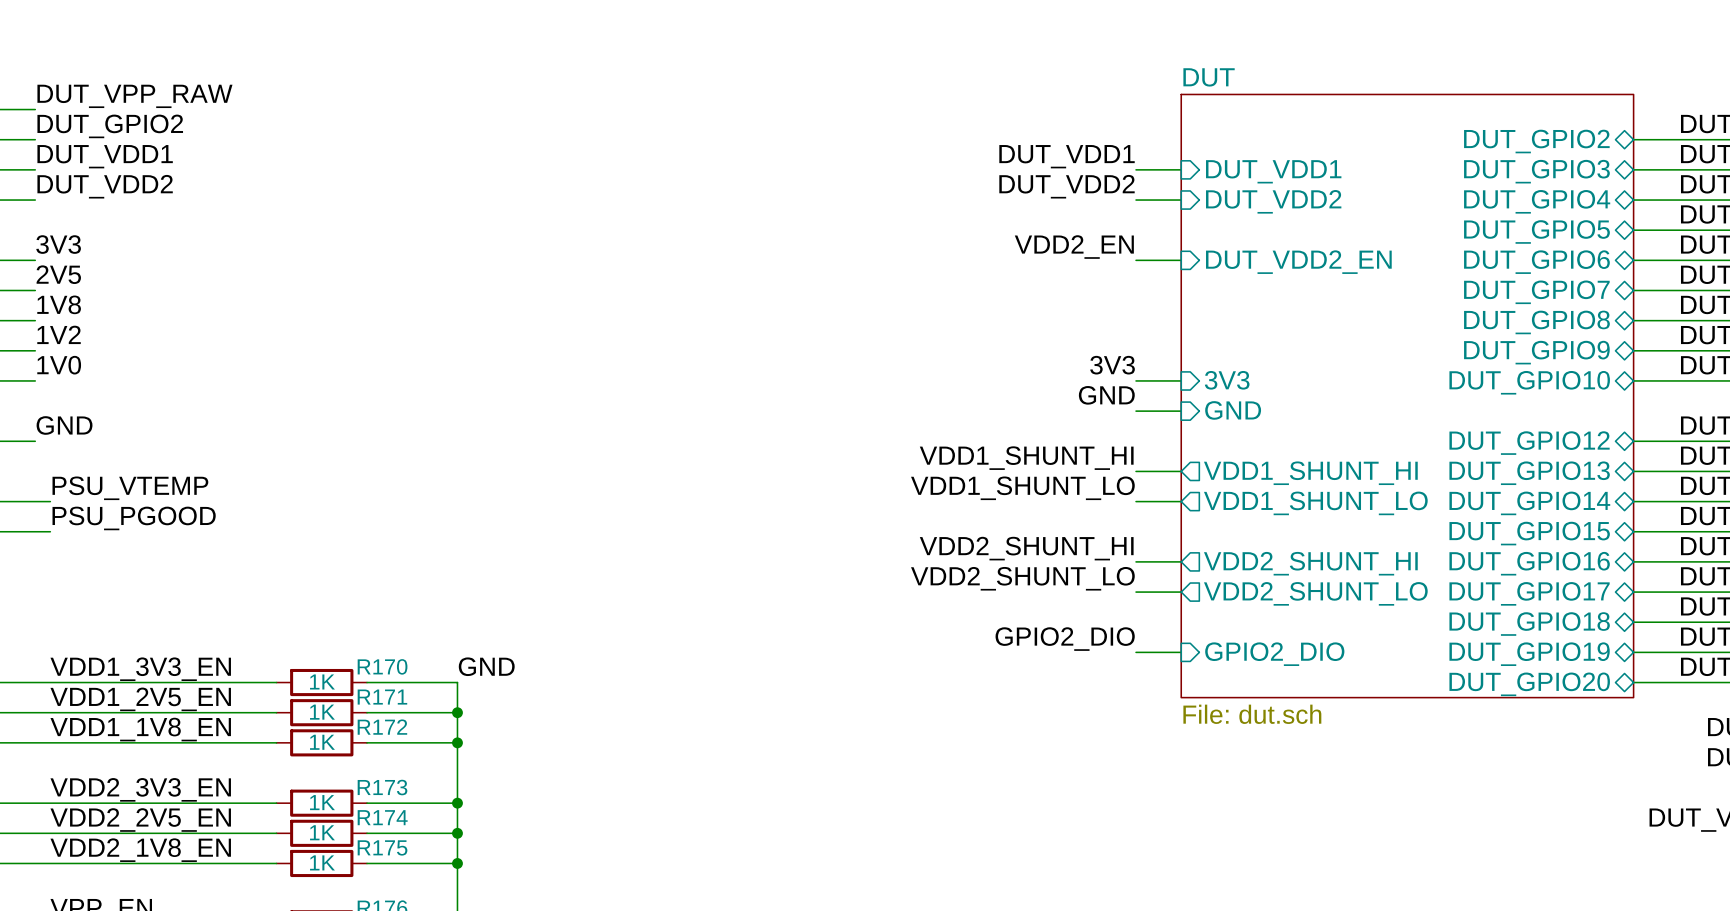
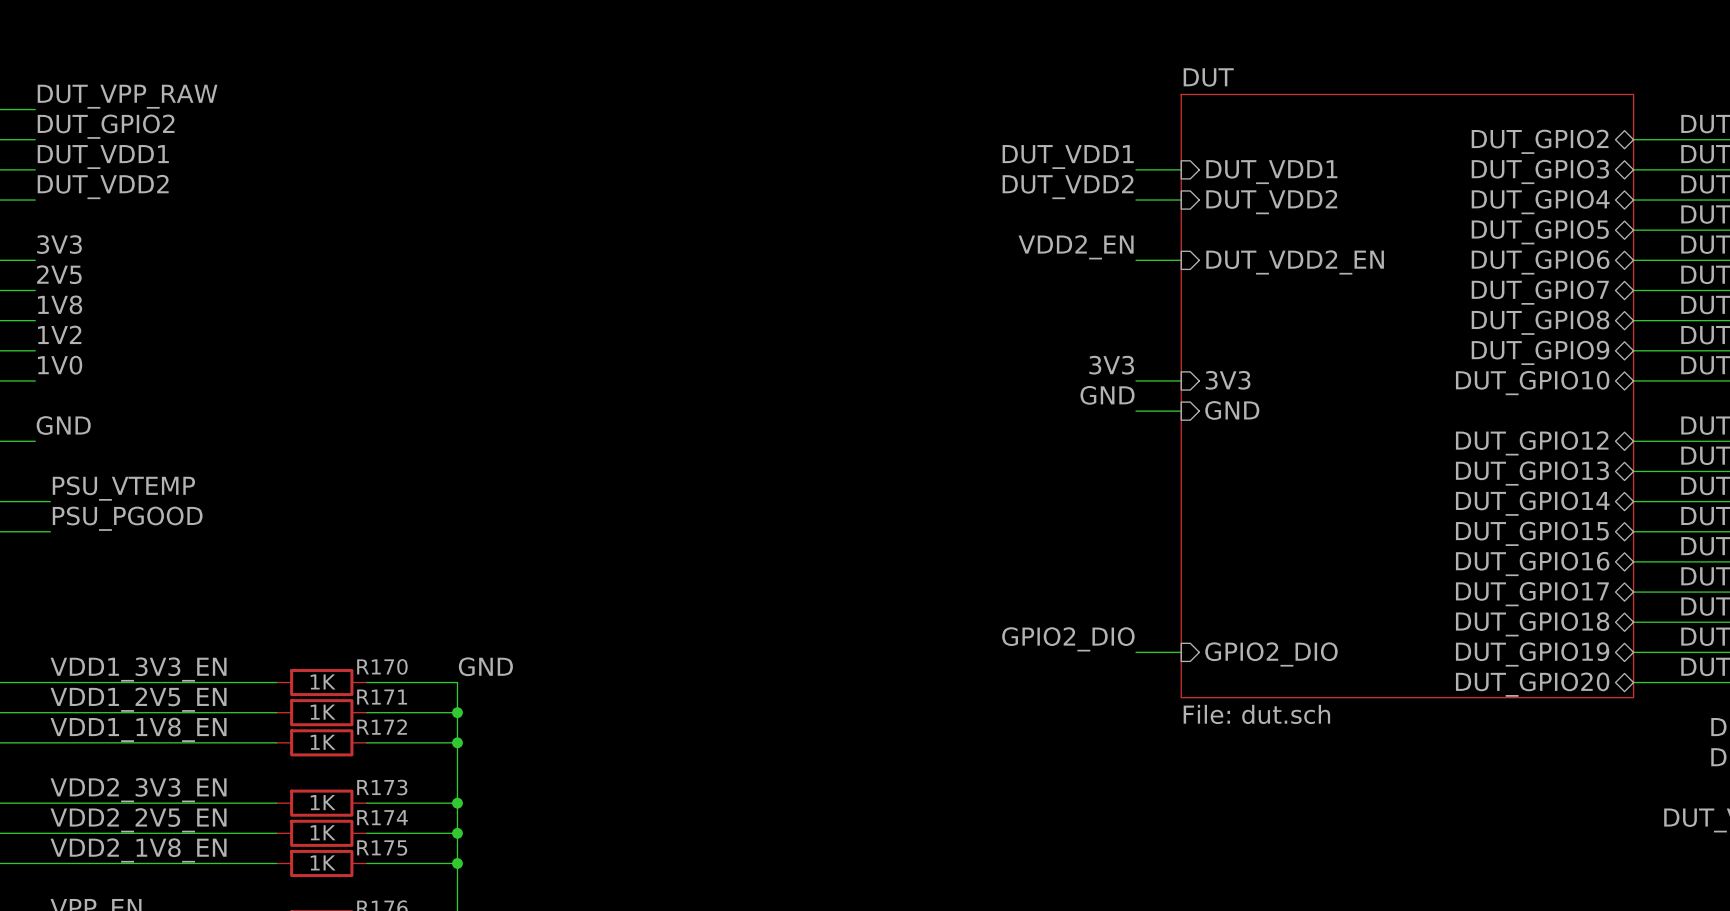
label: VDD1_SHUNT_HI (1026, 458) -> none
wire: (1136, 471) (1181, 471) -> none
sheet pin: VDD1_SHUNT_HI (1310, 473) -> none
label: VDD1_SHUNT_LO (1022, 488) -> none
wire: (1136, 501) (1181, 501) -> none
sheet pin: VDD1_SHUNT_LO (1315, 503) -> none
label: VDD2_SHUNT_HI (1026, 548) -> none
wire: (1136, 561) (1181, 561) -> none
sheet pin: VDD2_SHUNT_HI (1310, 563) -> none
label: VDD2_SHUNT_LO (1022, 578) -> none
wire: (1136, 592) (1181, 592) -> none
sheet pin: VDD2_SHUNT_LO (1315, 593) -> none

